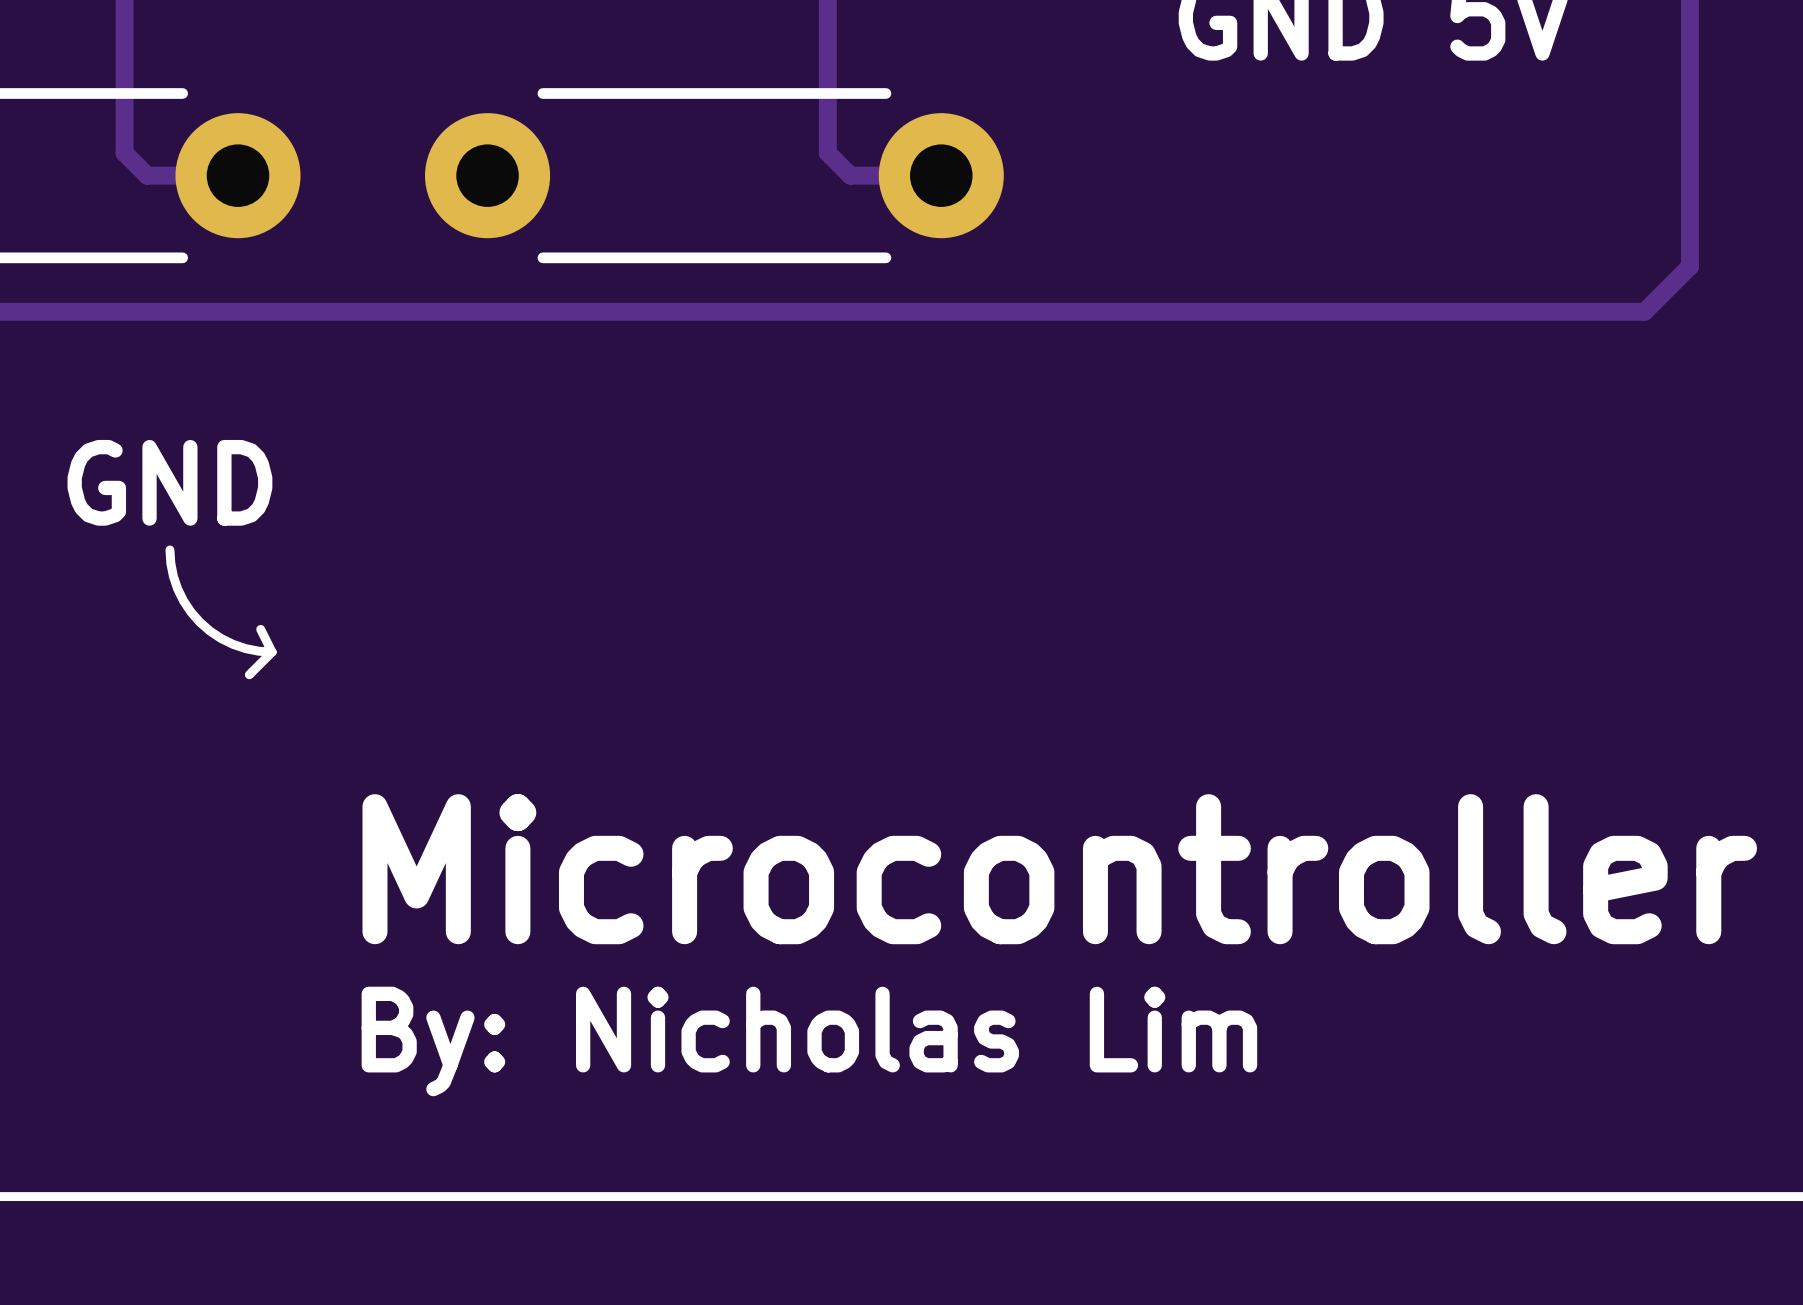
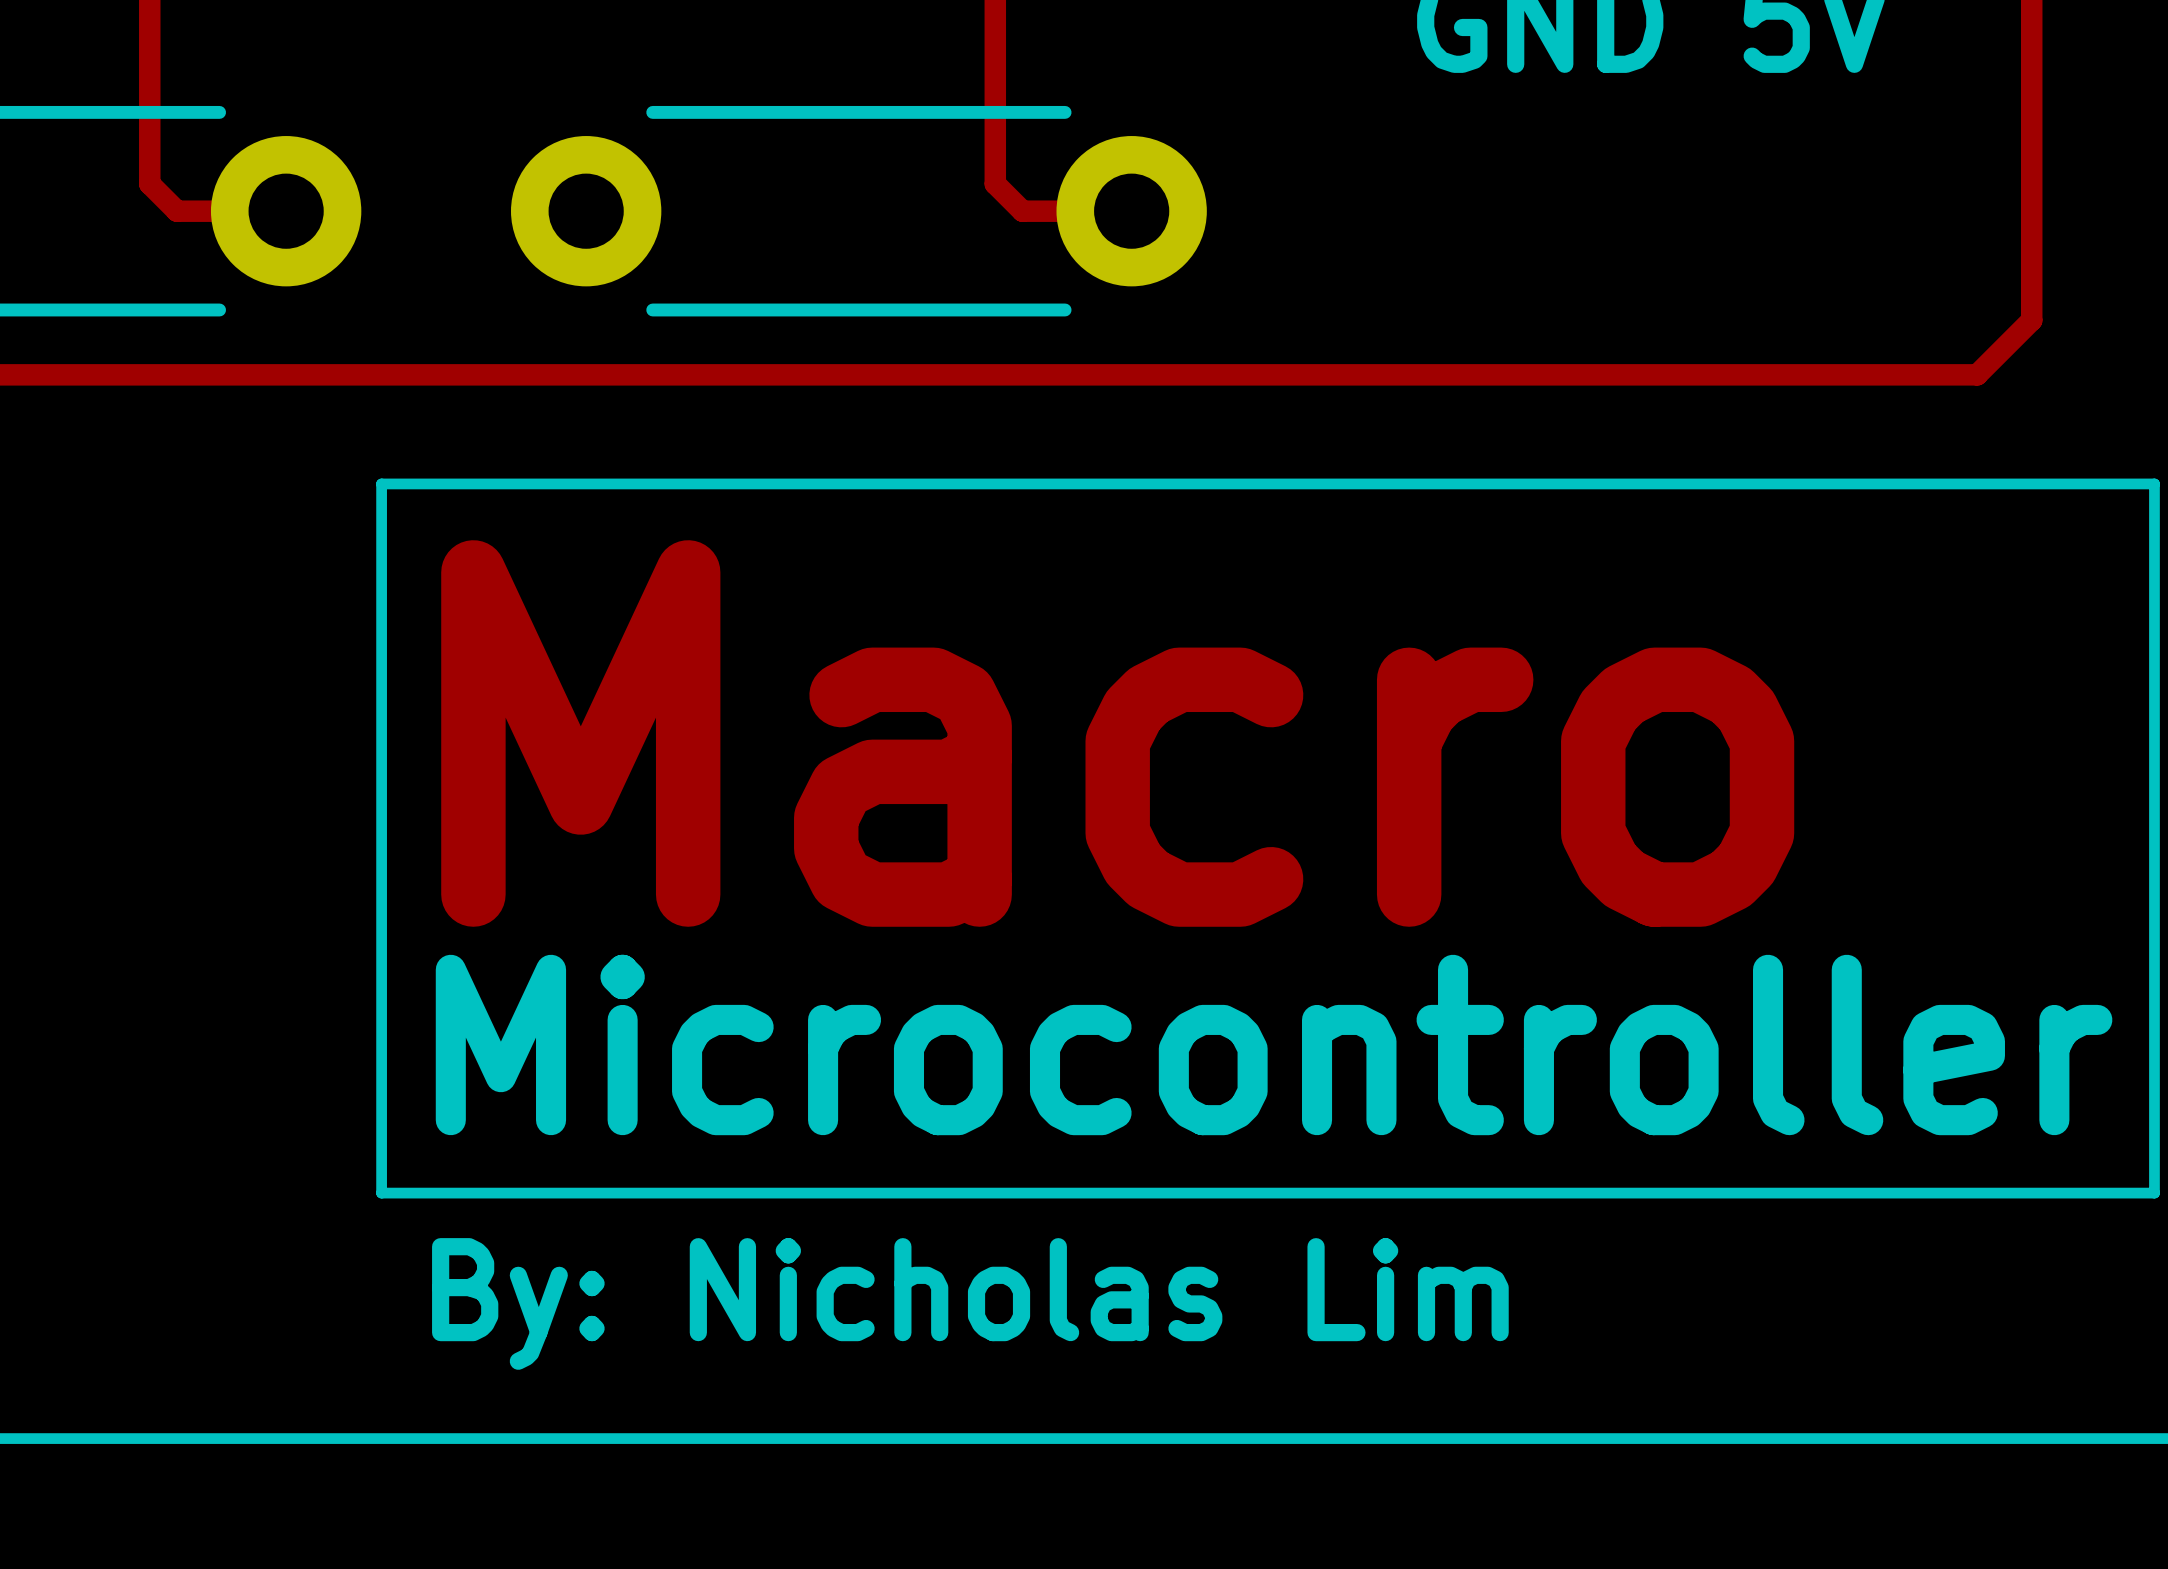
line: none -> (381, 483) (2154, 483) (2154, 1193) (381, 1193) (381, 483)
text: GND (169, 482) -> none
line: (169, 549) (173, 576) (177, 589) (191, 612) (199, 622) (209, 630) (232, 644) (245, 648) (272, 652) -> none
text: none -> Macro (1117, 733)
line: (260, 629) (272, 652) -> none
line: (272, 652) (249, 674) -> none
text position: By: Nicholas Lim (809, 1041) -> By: Nicholas Lim (970, 1303)

